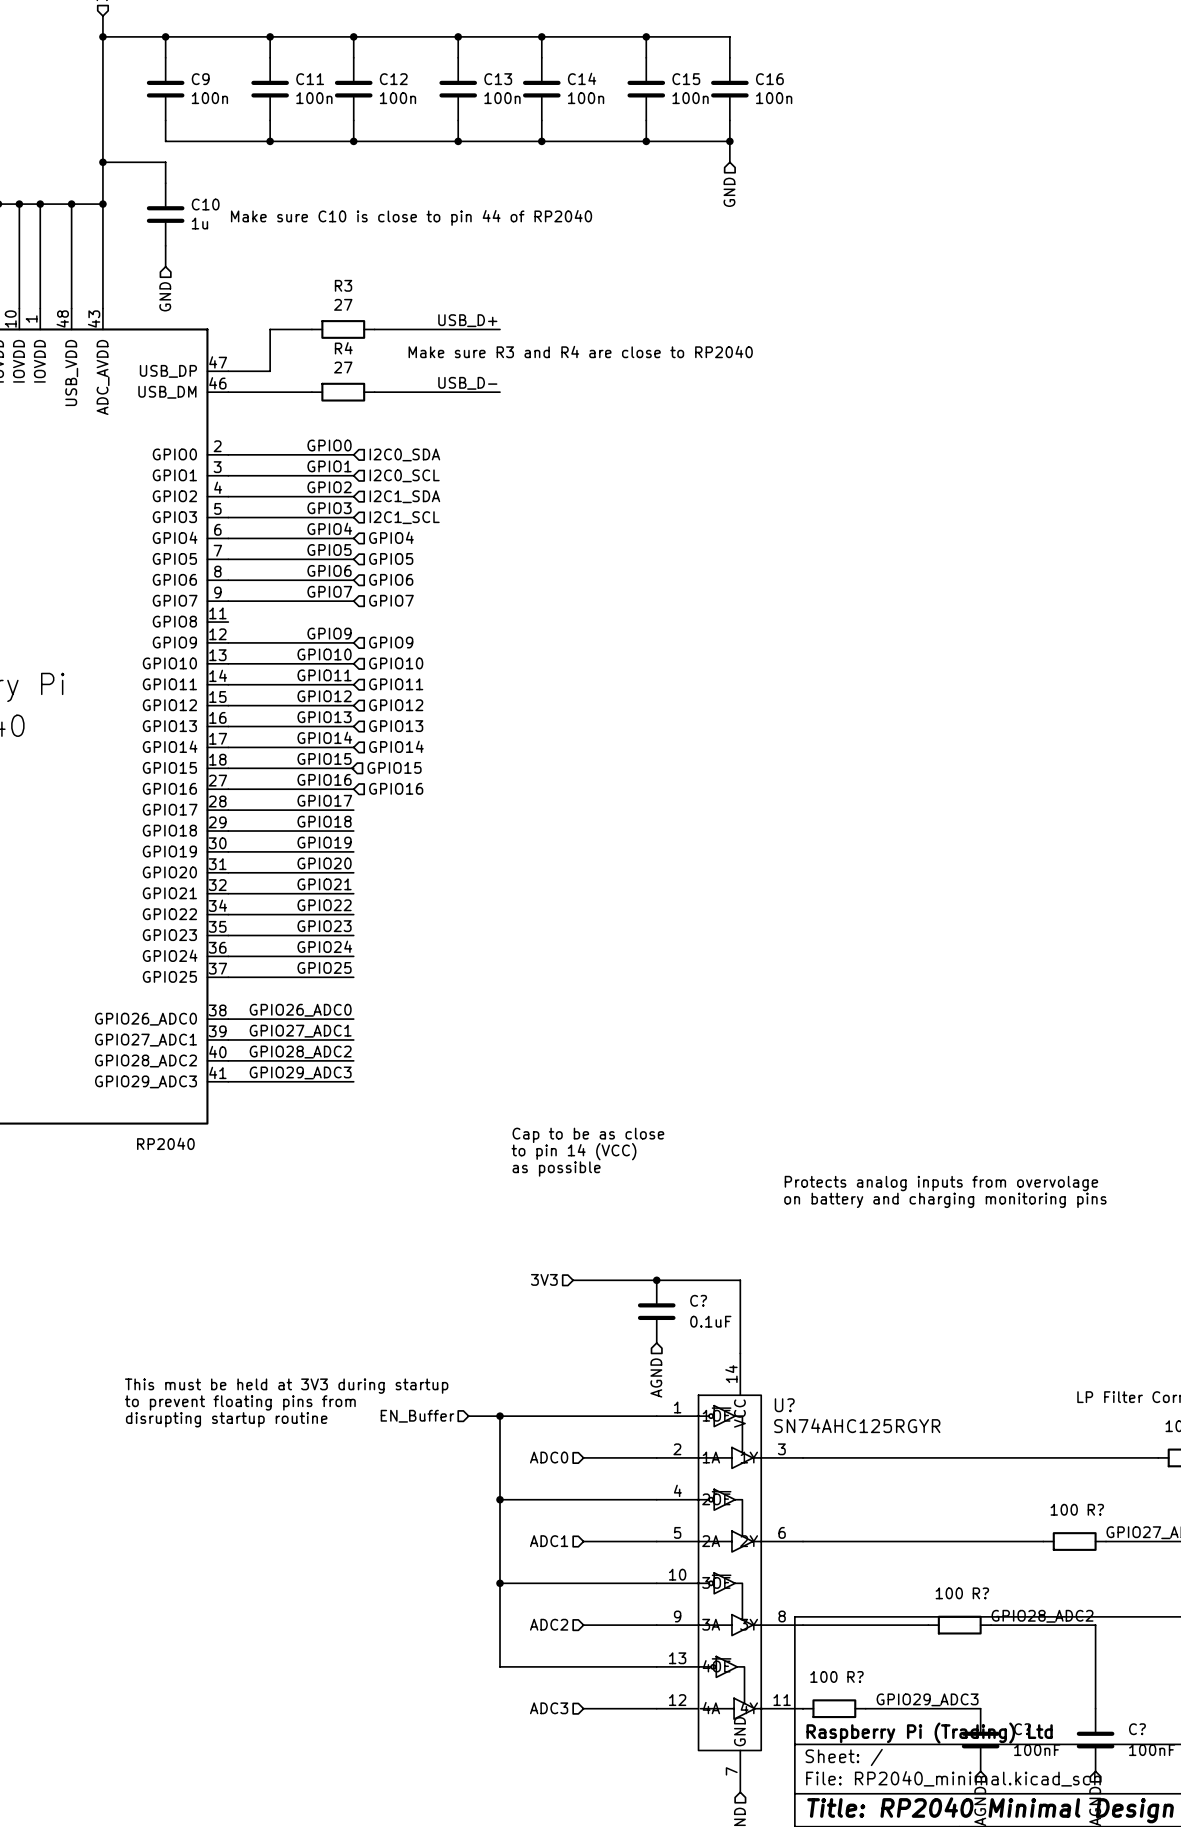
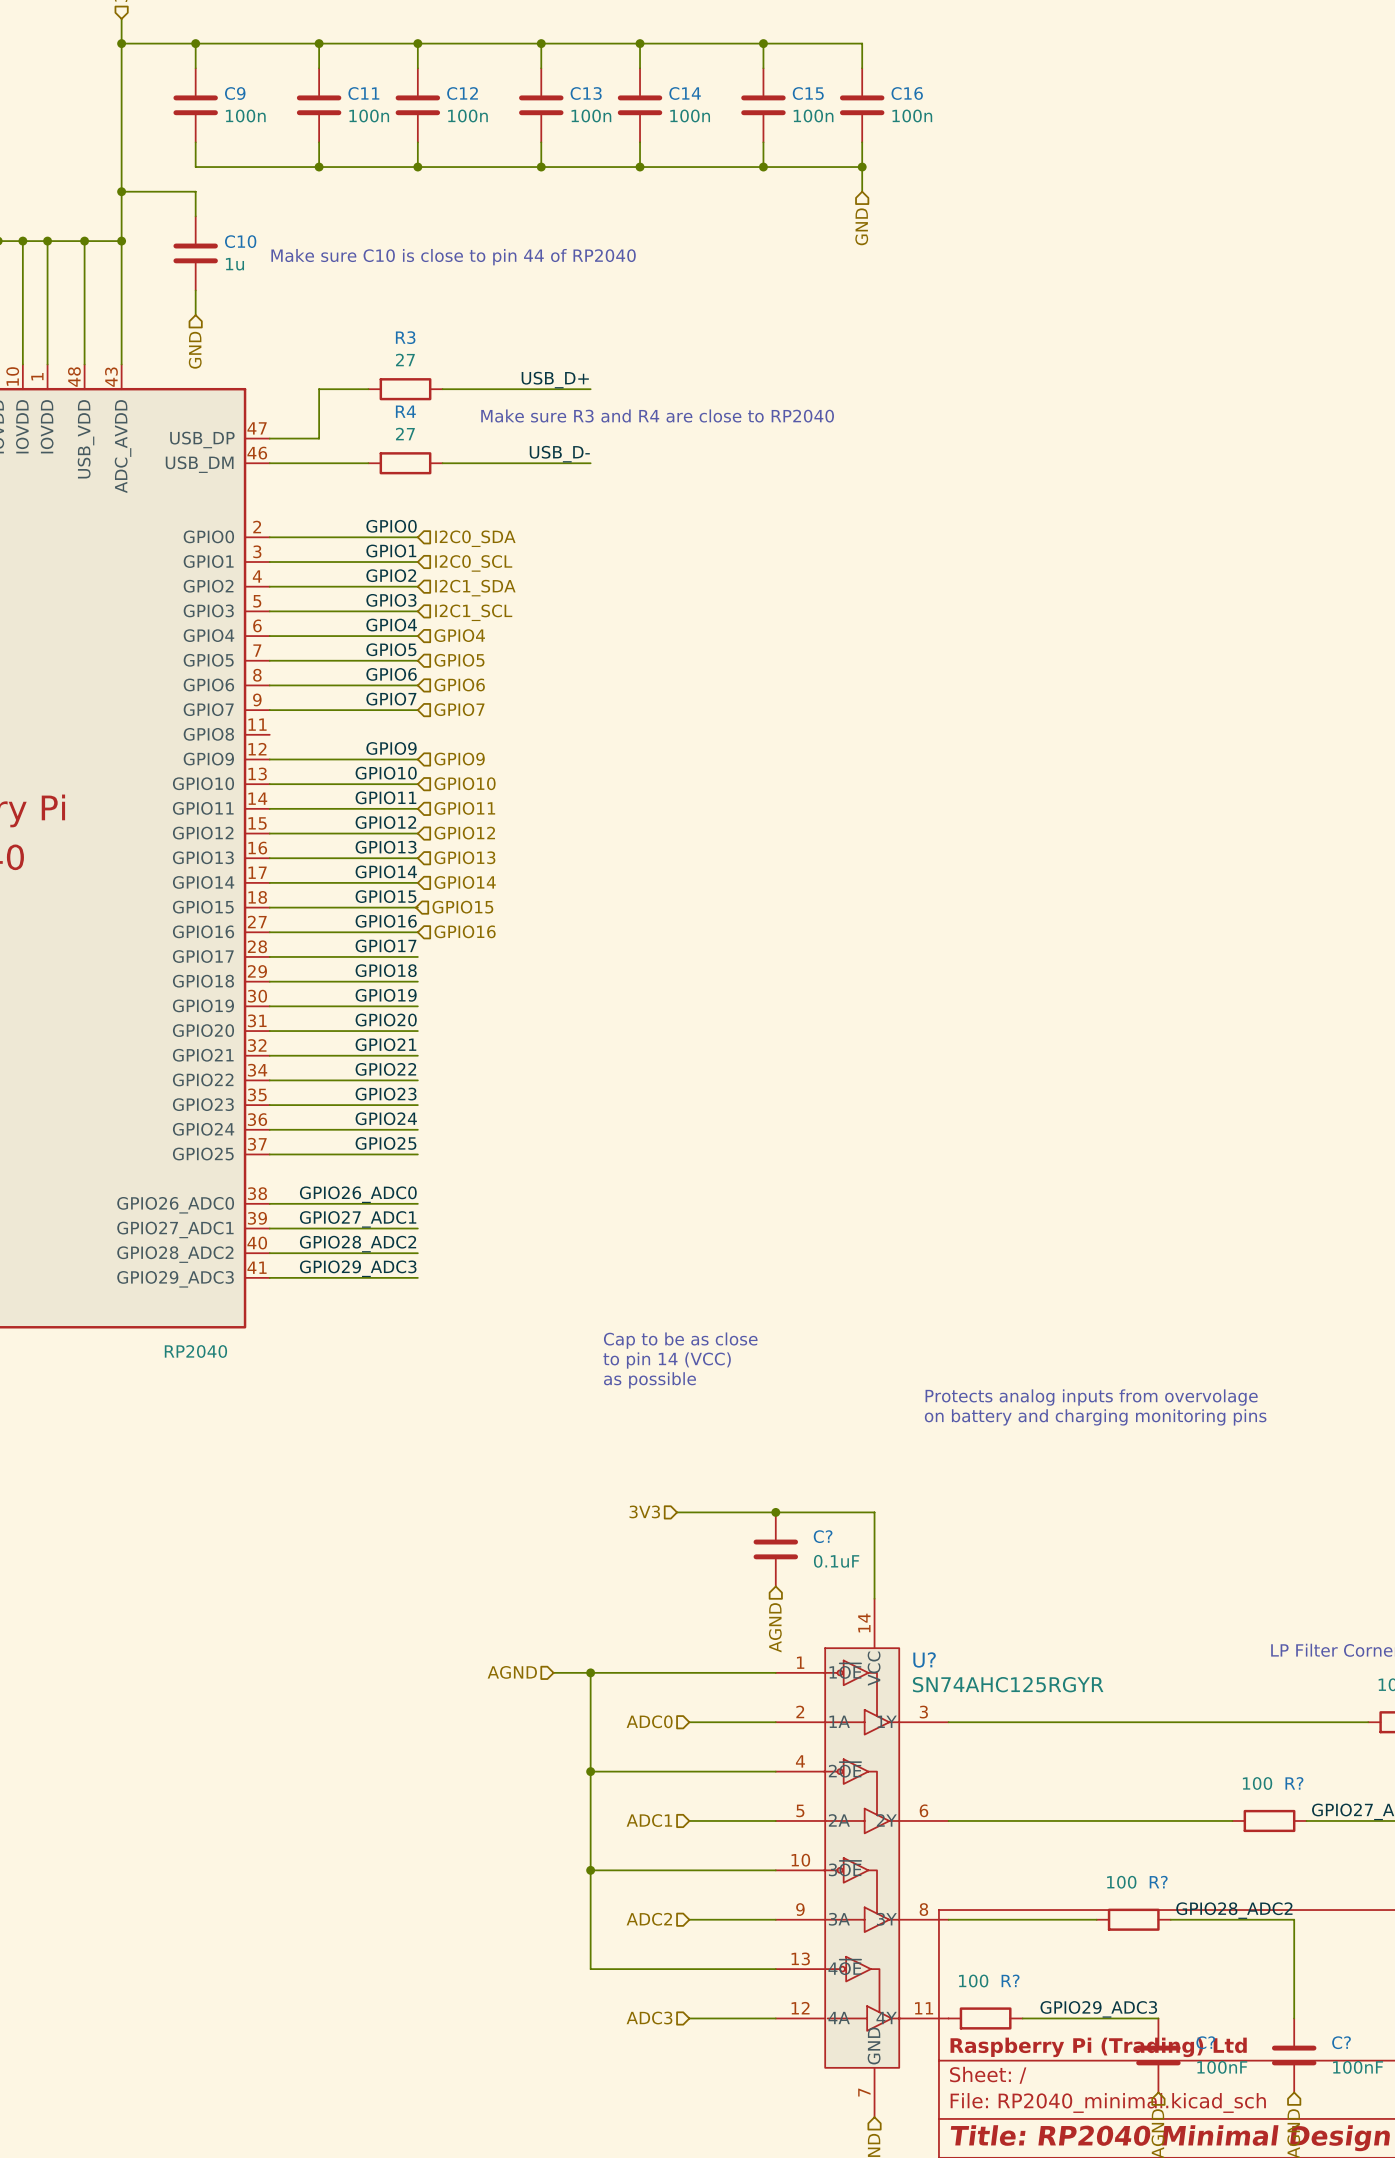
text: This must be held at 3V3 during startup (286, 1386) -> none
text: to prevent floating pins from (240, 1402) -> none
hierarchical label: EN_Buffer (417, 1416) -> AGND (512, 1672)
text: disrupting startup routine (226, 1419) -> none

